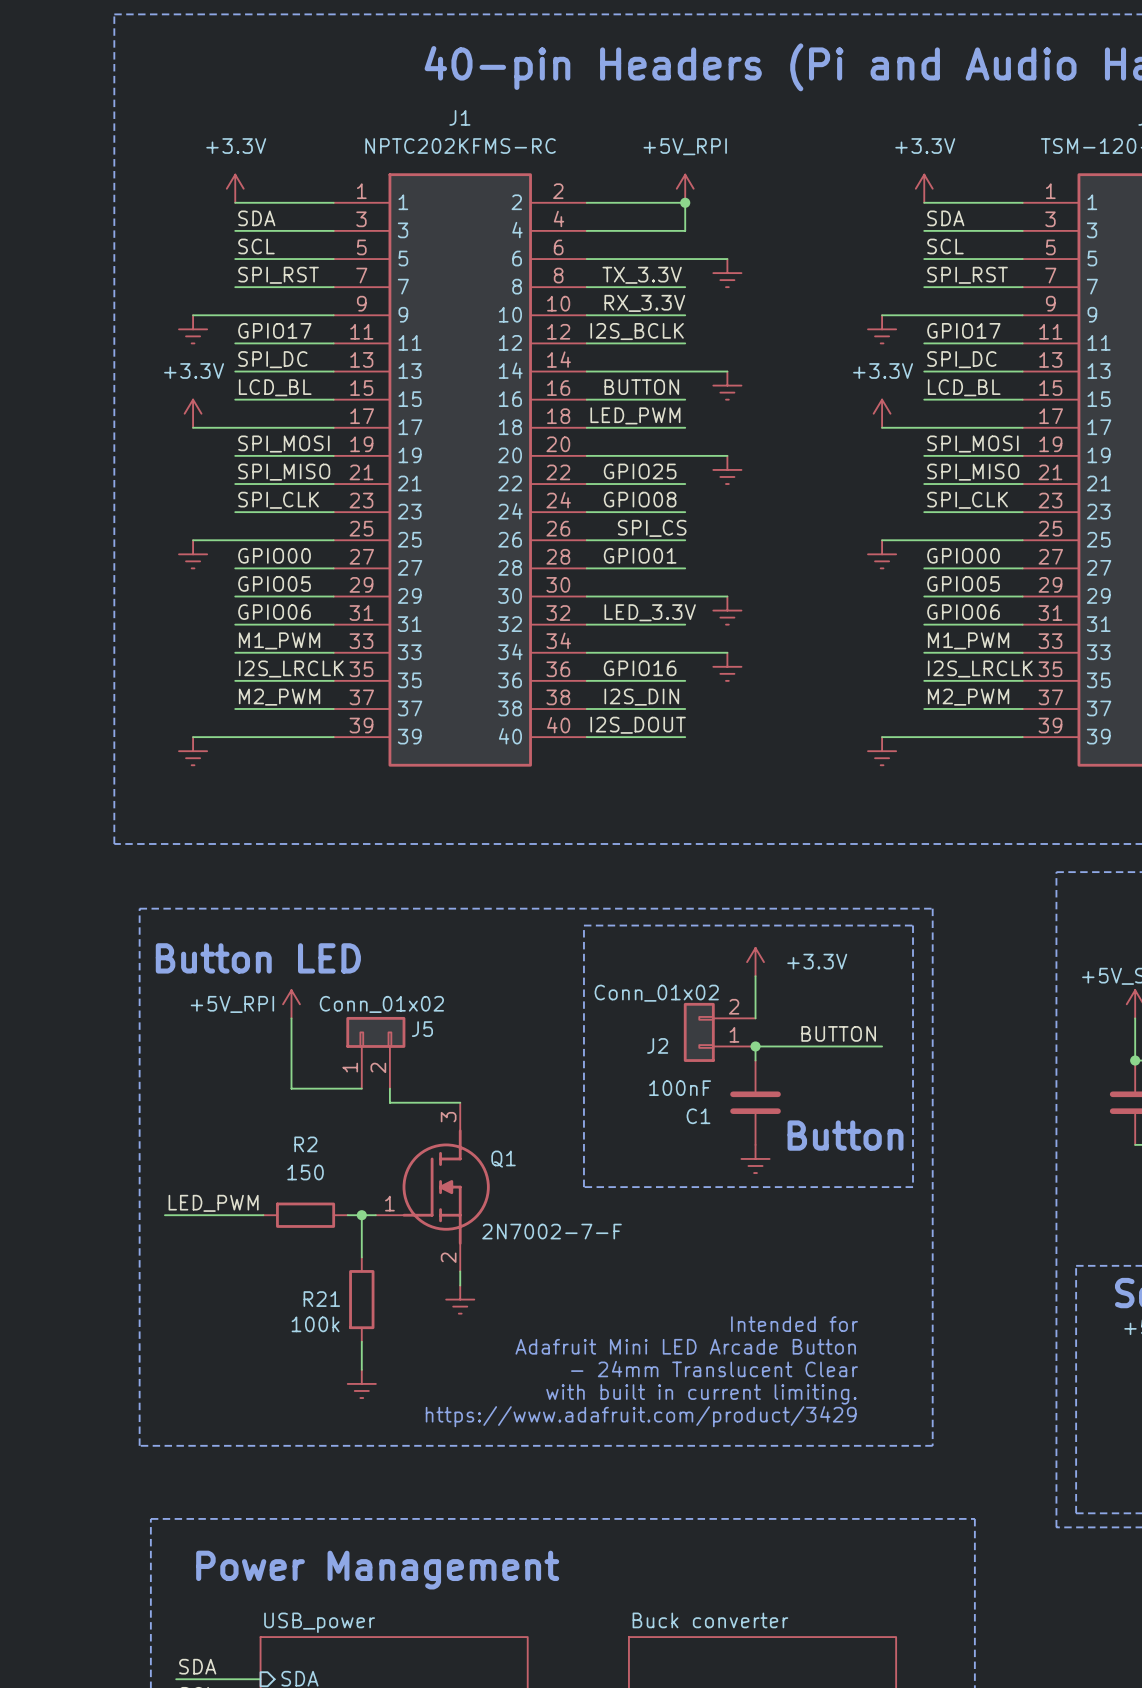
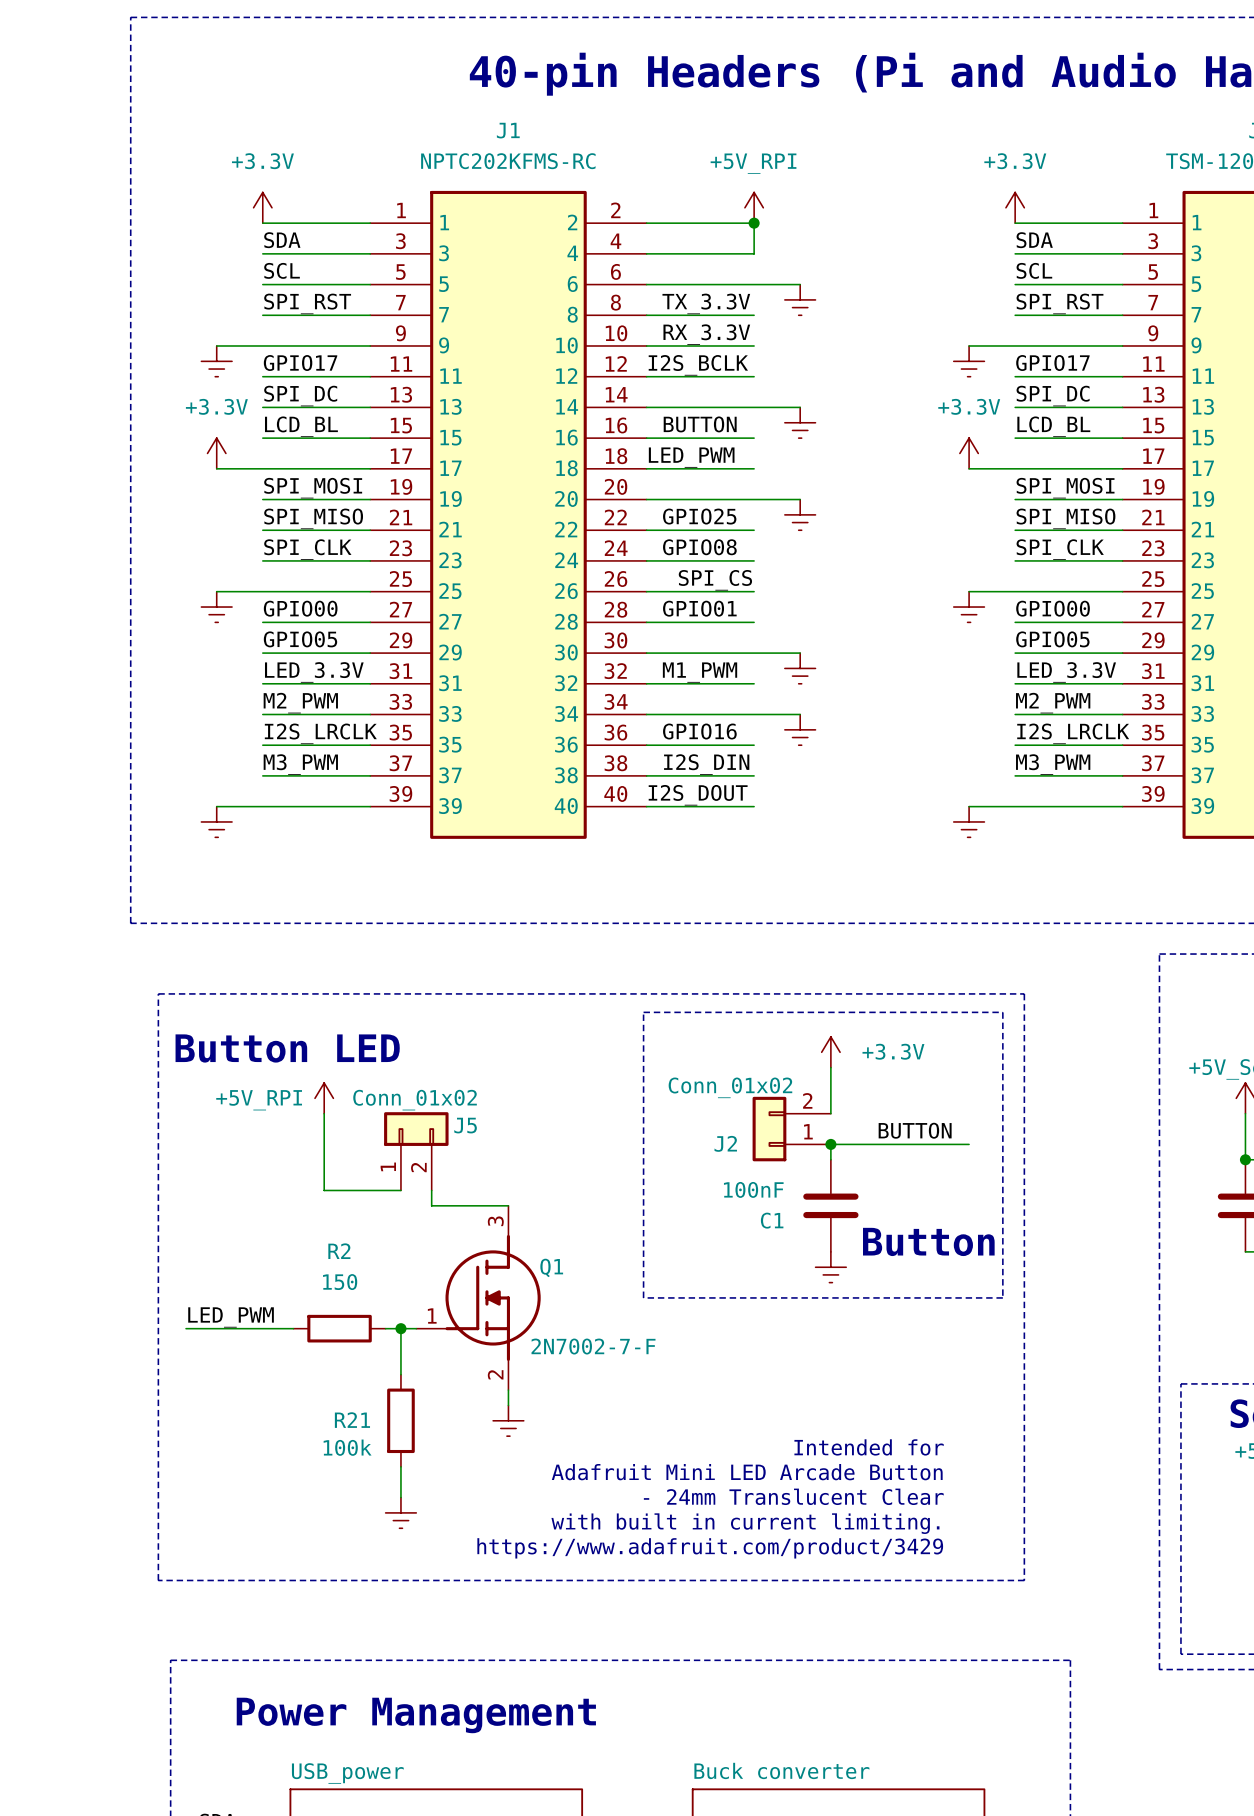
label: GPIO06 (274, 612) -> LED_3.3V (314, 672)
label: LED_3.3V (650, 612) -> M1_PWM (700, 672)
label: GPIO06 (963, 612) -> LED_3.3V (1066, 672)
label: M1_PWM (279, 640) -> M2_PWM (300, 703)
label: M1_PWM (968, 640) -> M2_PWM (1053, 703)
label: M2_PWM (279, 697) -> M3_PWM (300, 764)
label: M2_PWM (968, 697) -> M3_PWM (1053, 764)

